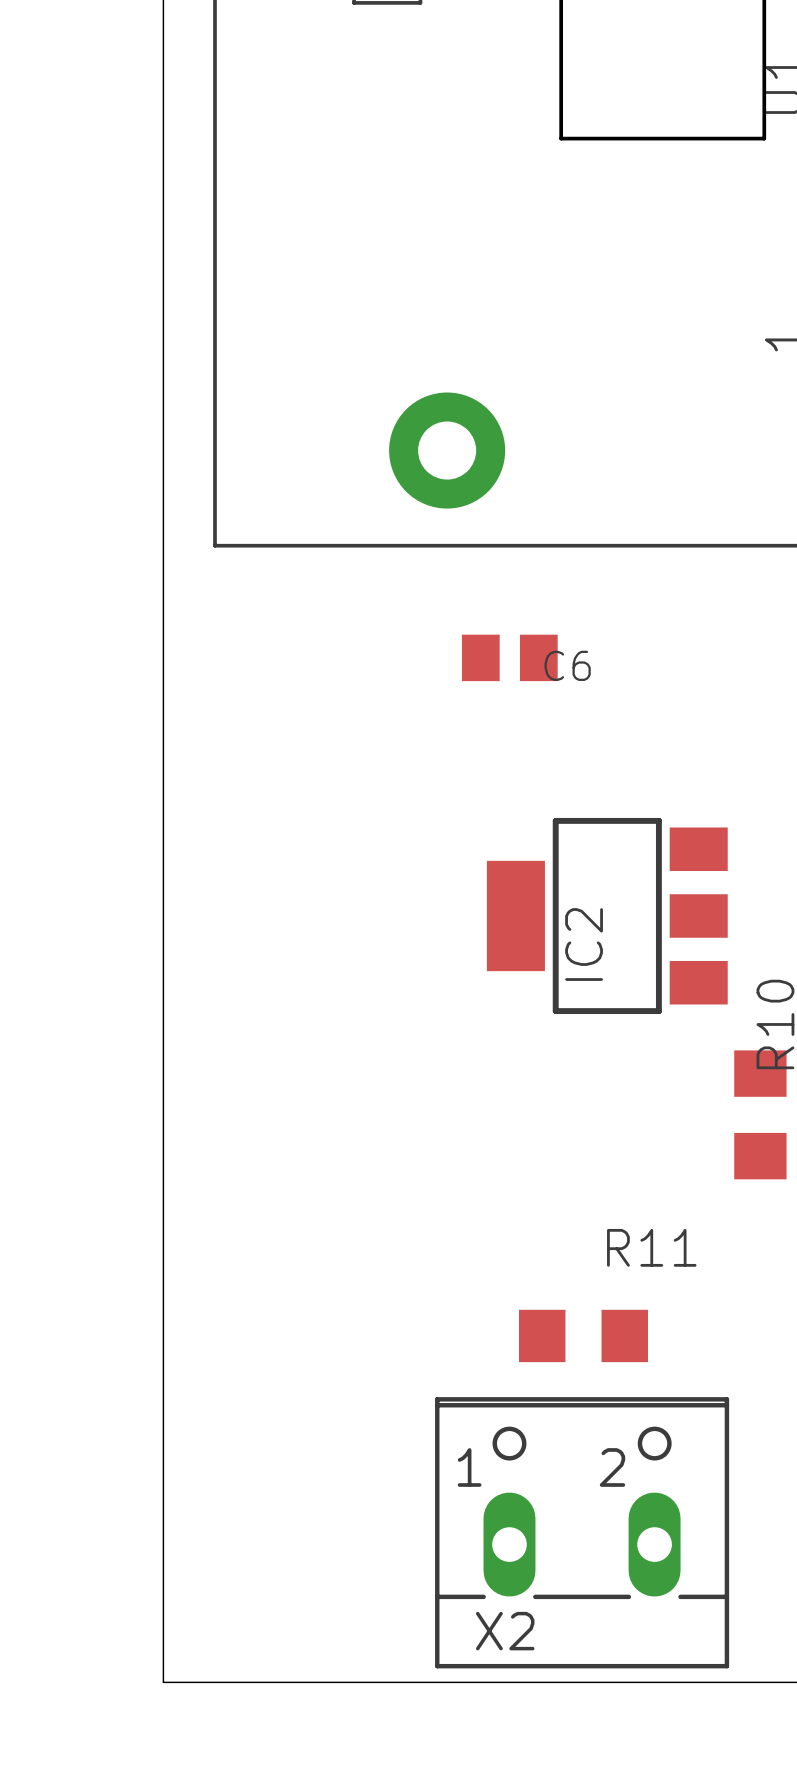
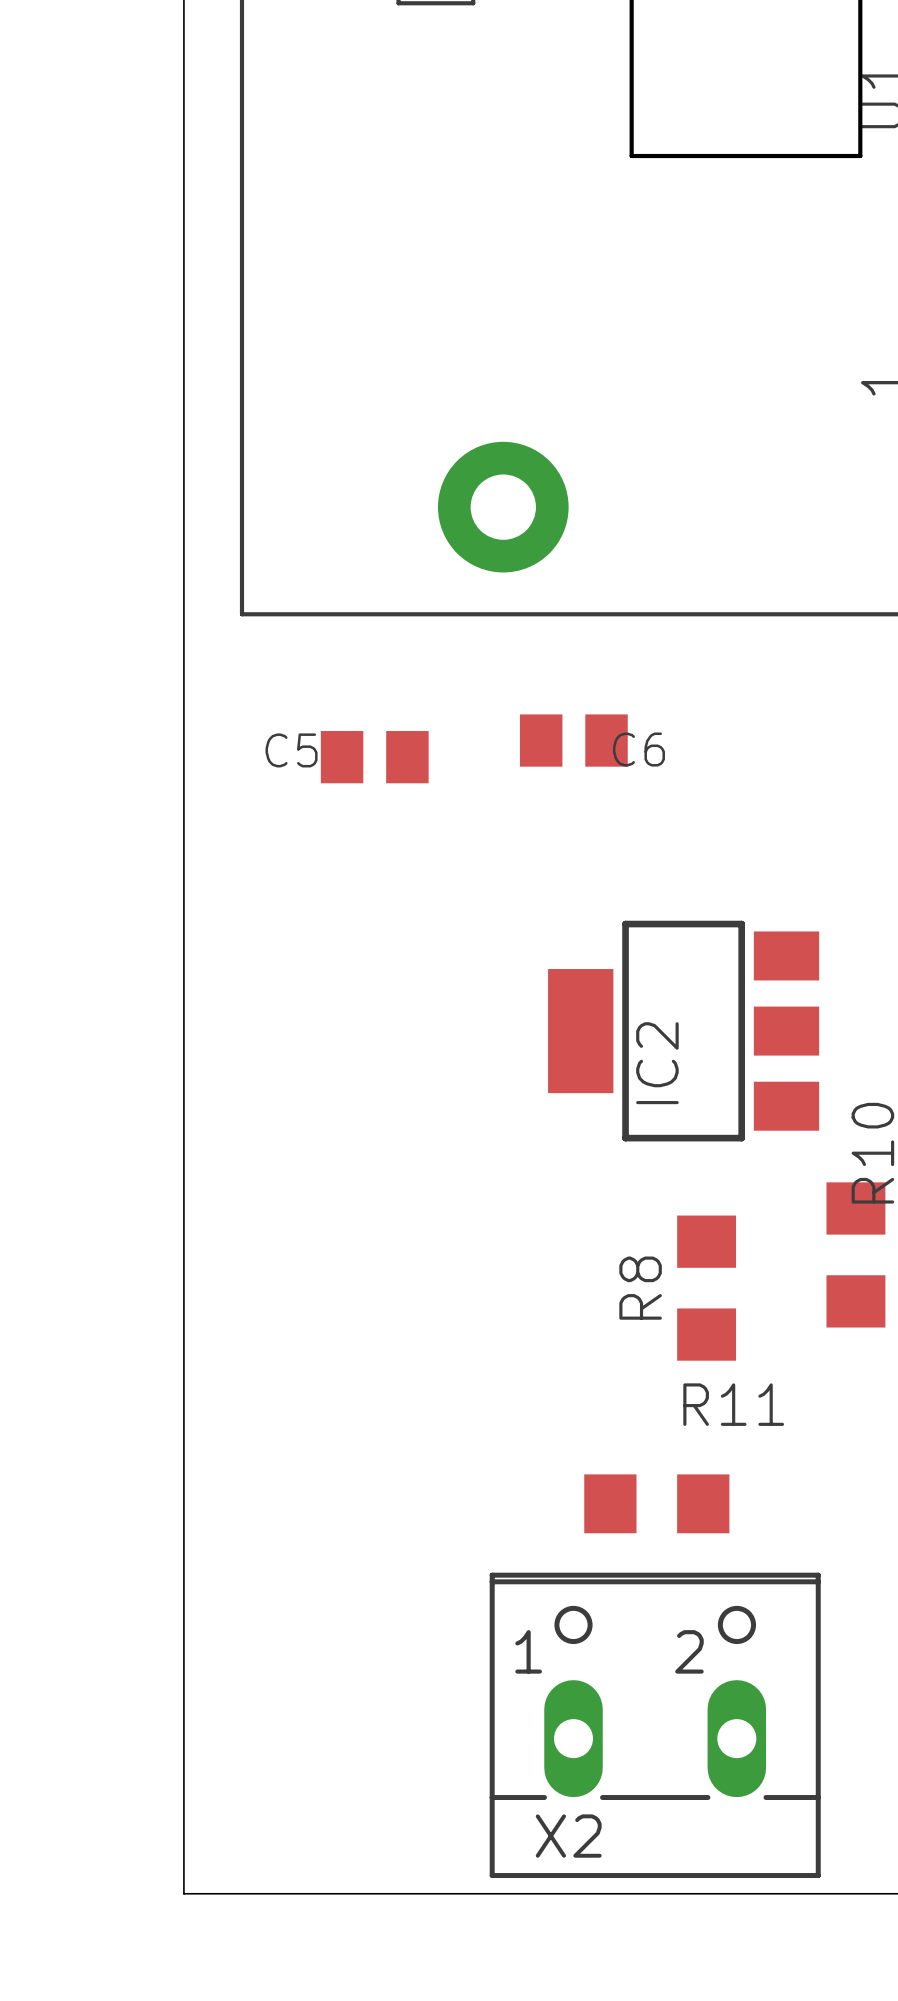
C5: none -> (374, 757)
R8: none -> (706, 1288)

